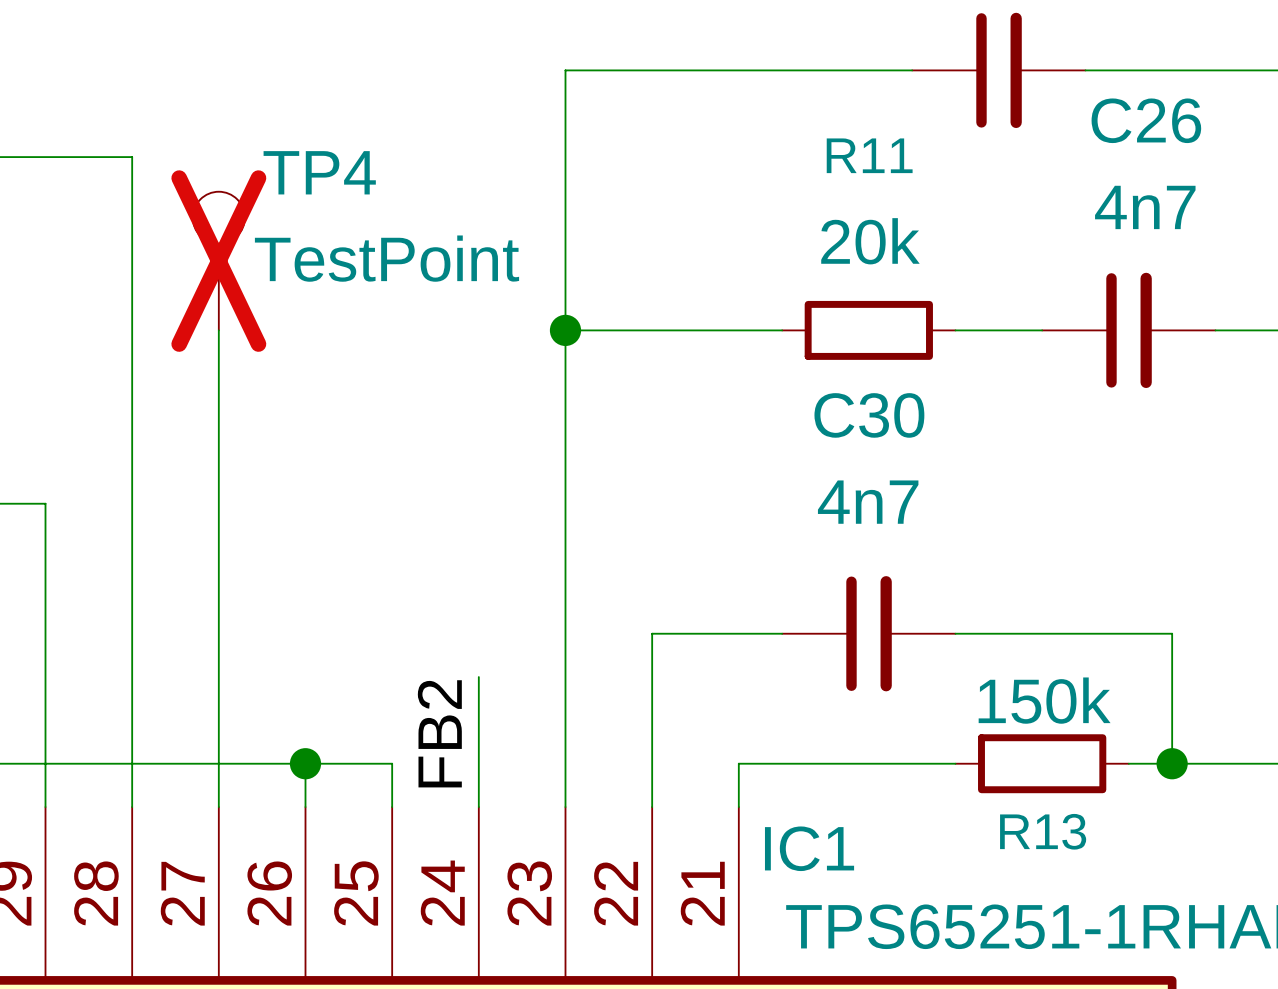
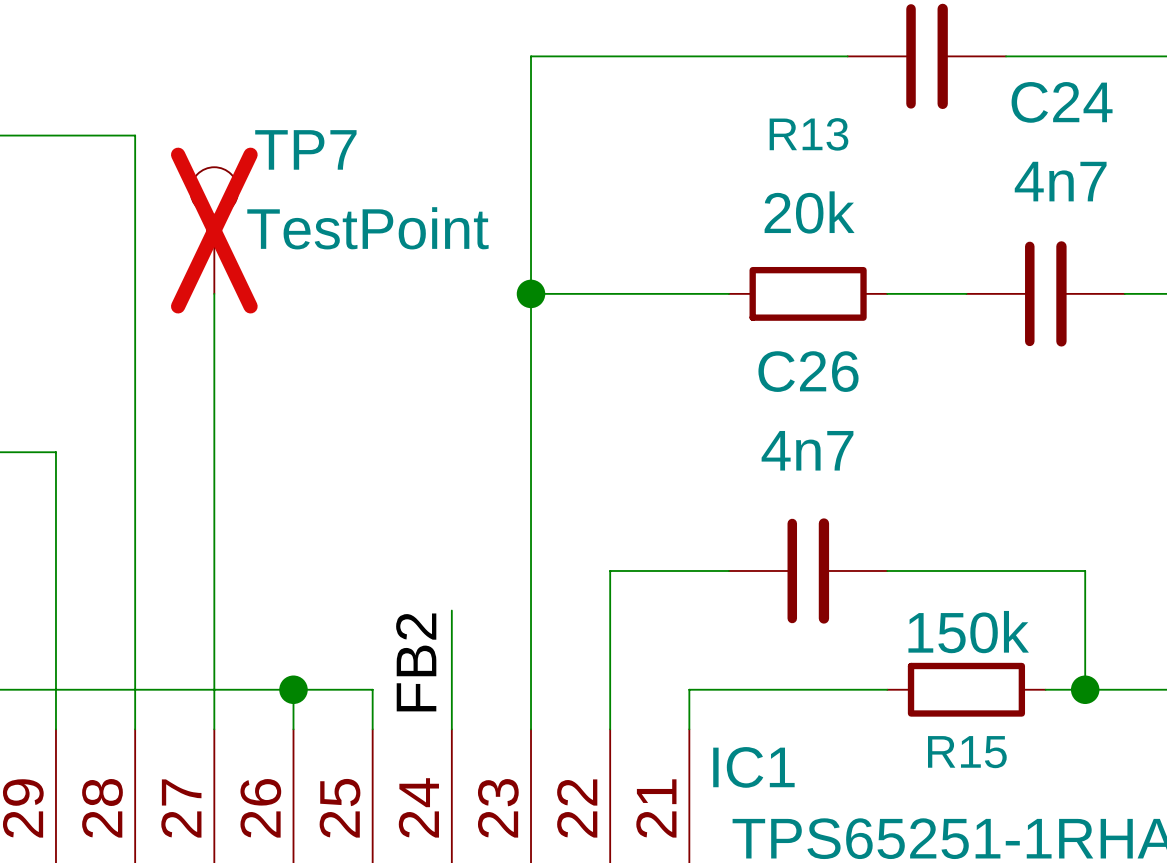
C26 name: C26 (1146, 120) -> C24 (1062, 102)
R11 name: R11 (869, 155) -> R13 (808, 134)
TP4 name: TP4 (319, 172) -> TP7 (305, 149)
C30 name: C30 (869, 415) -> C26 (808, 371)
R13 name: R13 (1043, 831) -> R15 (967, 752)

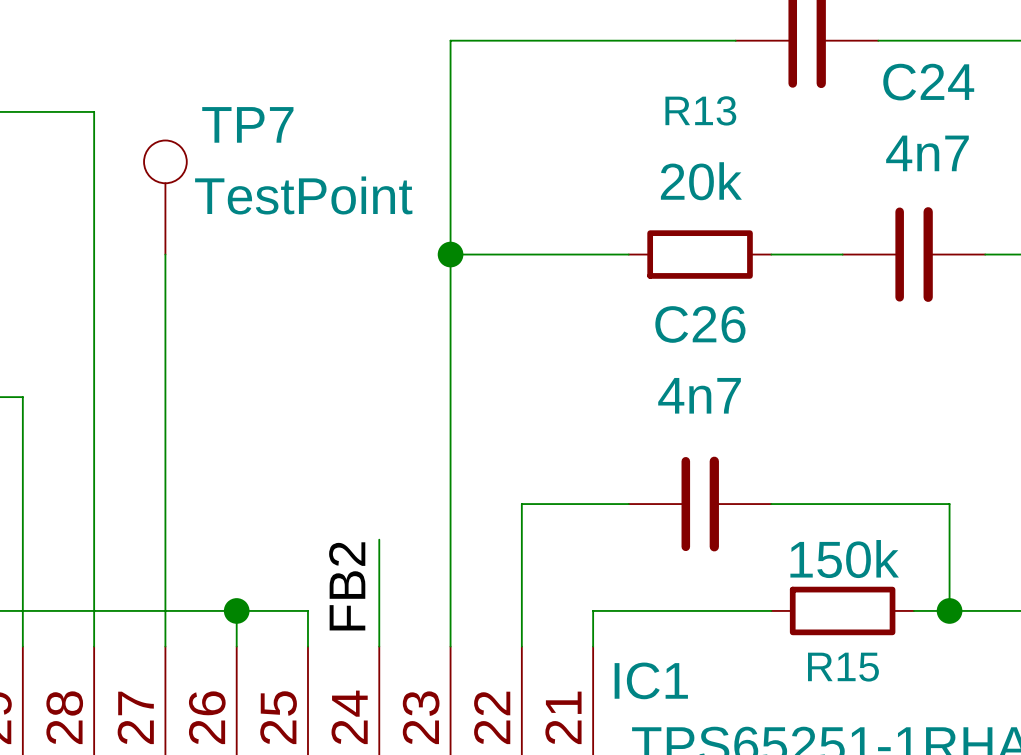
TP7 do-not-place cross: (214, 230) -> none

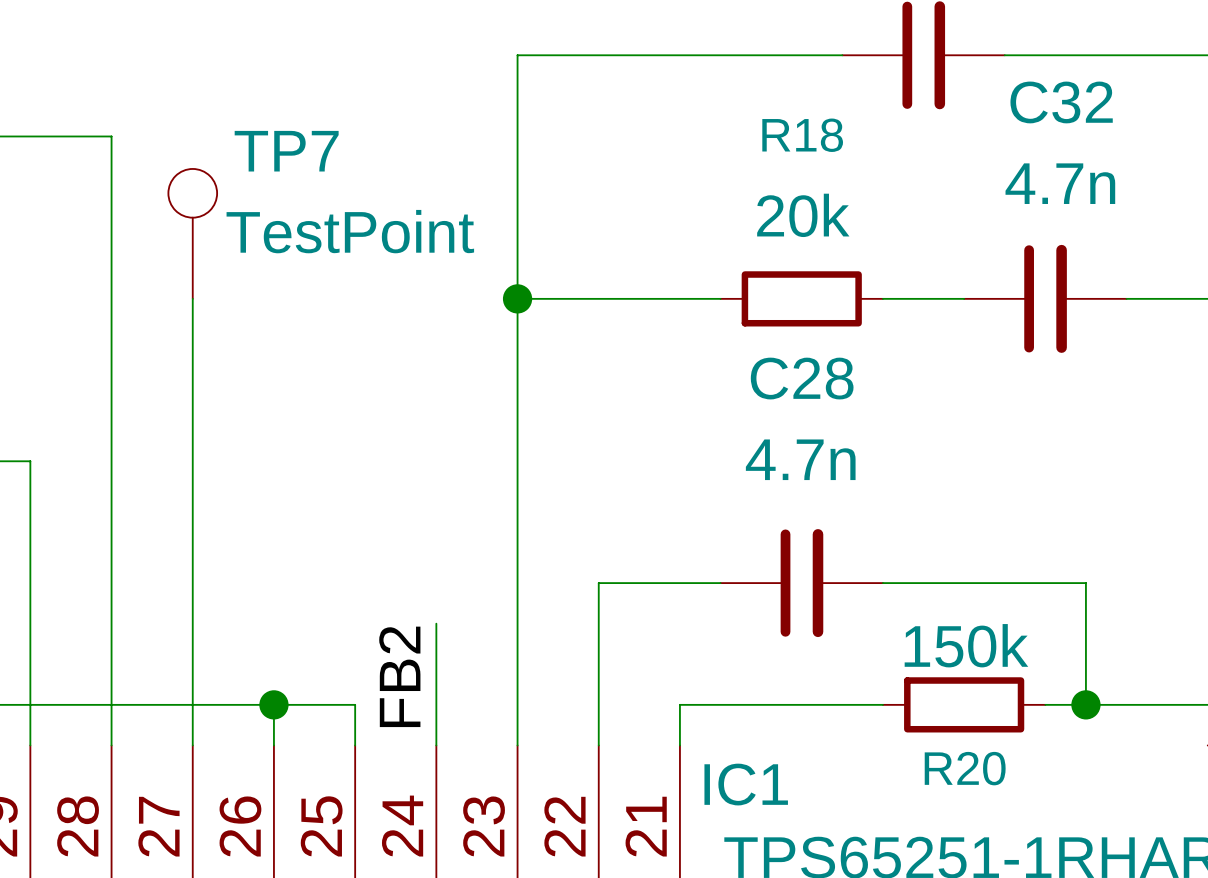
C24 name: C24 (928, 82) -> C32 (1061, 102)
R13 name: R13 (700, 110) -> R18 (802, 135)
C24 value: 4n7 (927, 153) -> 4.7n (1060, 183)
C26 name: C26 (700, 324) -> C28 (802, 378)
C26 value: 4n7 (699, 395) -> 4.7n (800, 459)
R15 name: R15 (843, 667) -> R20 (965, 768)

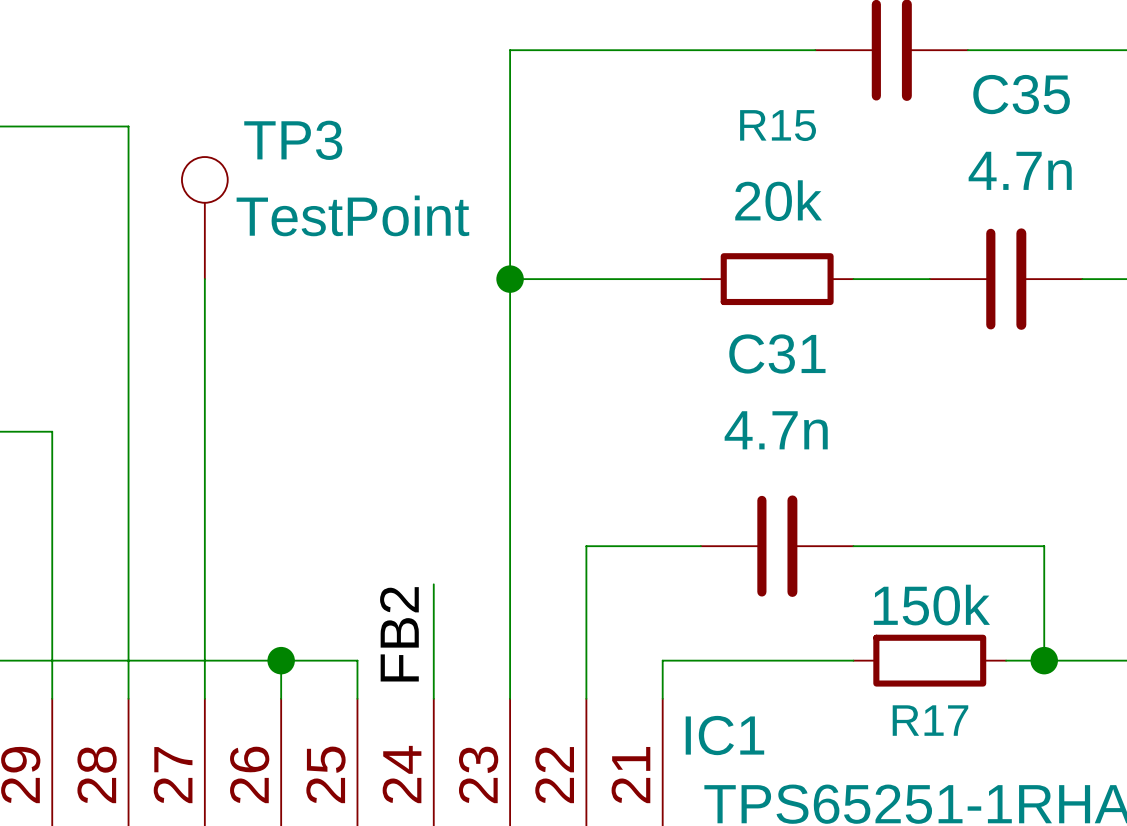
C32 name: C32 (1061, 102) -> C35 (1021, 94)
R18 name: R18 (802, 135) -> R15 (778, 125)
TP7 name: TP7 (286, 151) -> TP3 (293, 140)
C28 name: C28 (802, 378) -> C31 (777, 353)
R20 name: R20 (965, 768) -> R17 (930, 720)

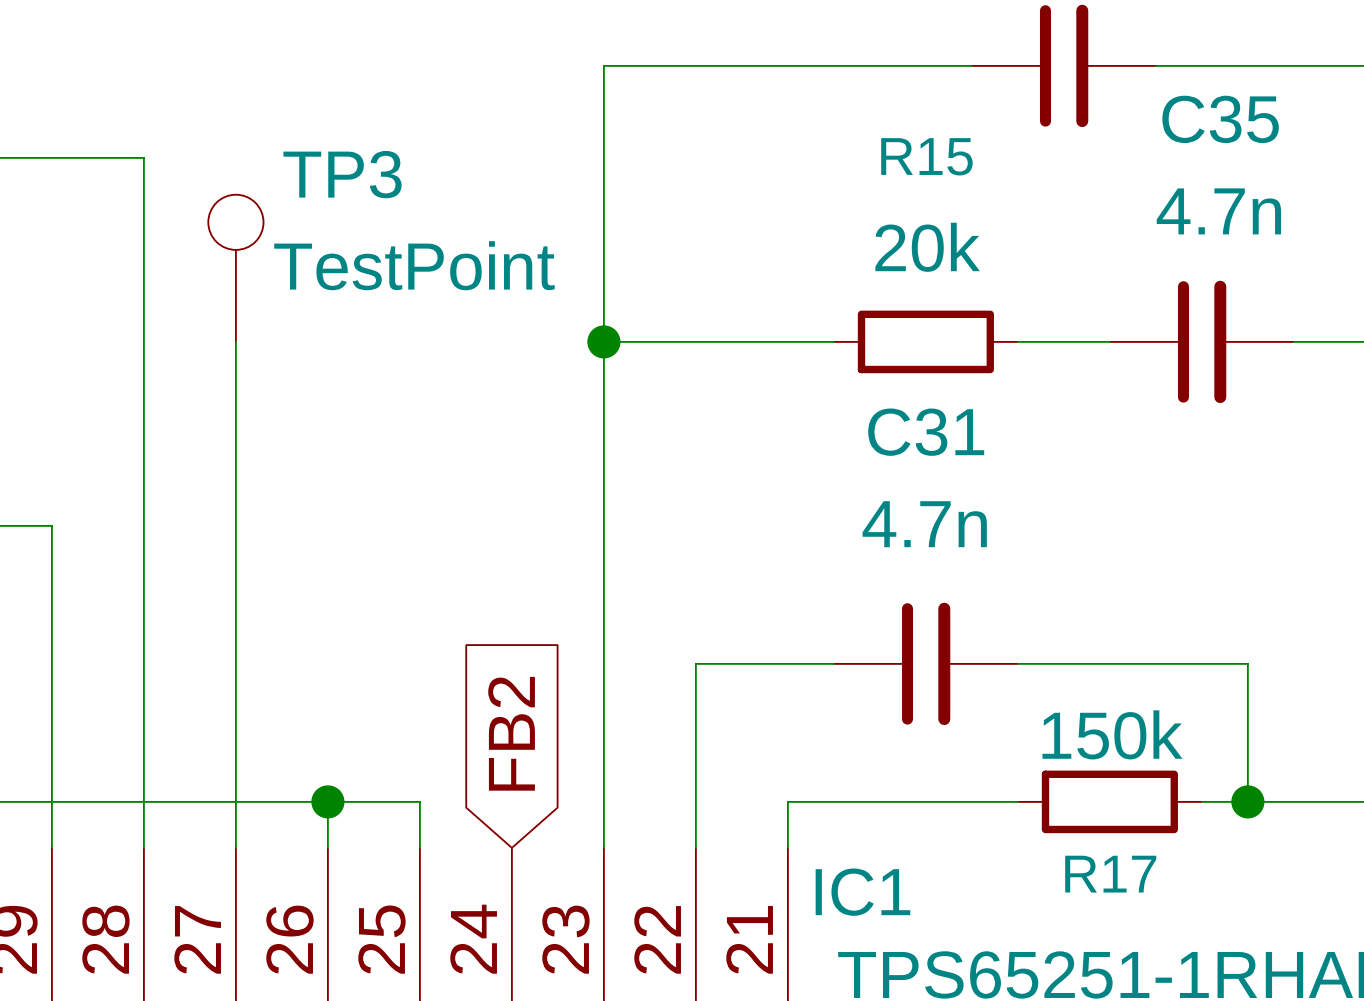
wire: (433, 584) (433, 698) -> none
global label: none -> FB2 (511, 733)
label: FB2 (399, 634) -> none

